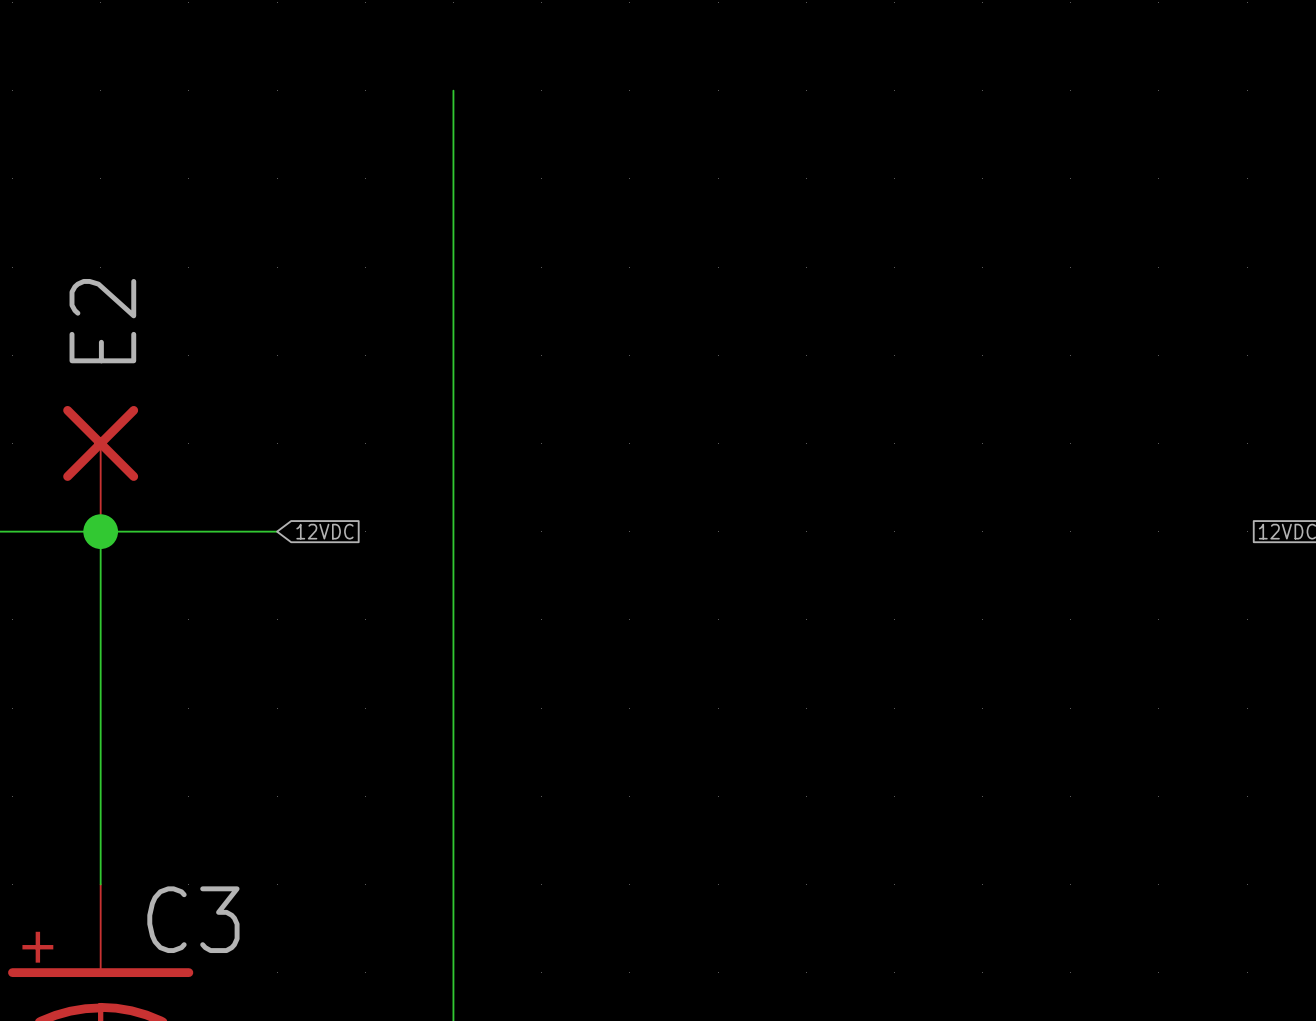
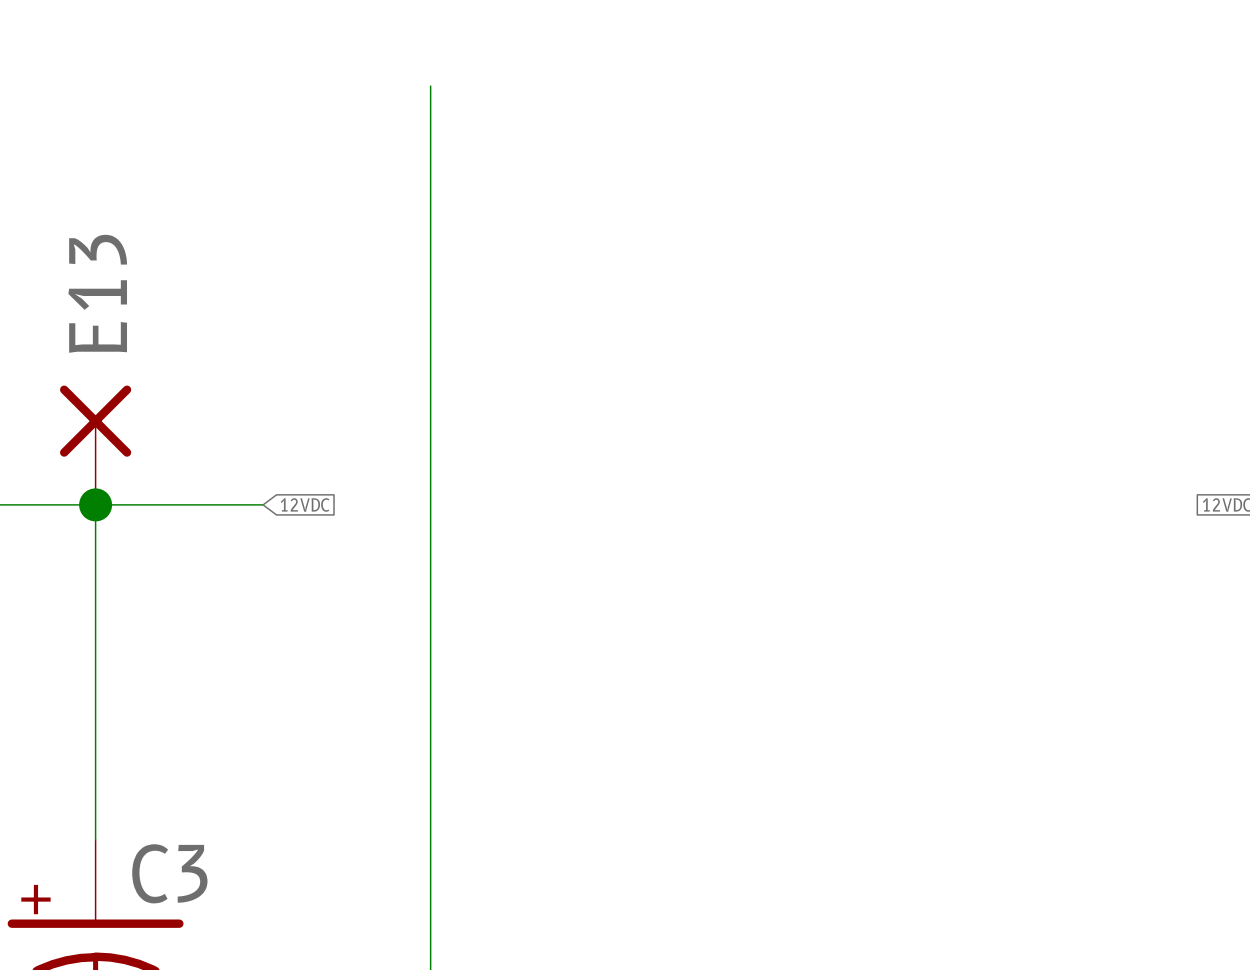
E2 name: E2 (102, 321) -> E13 (97, 293)

